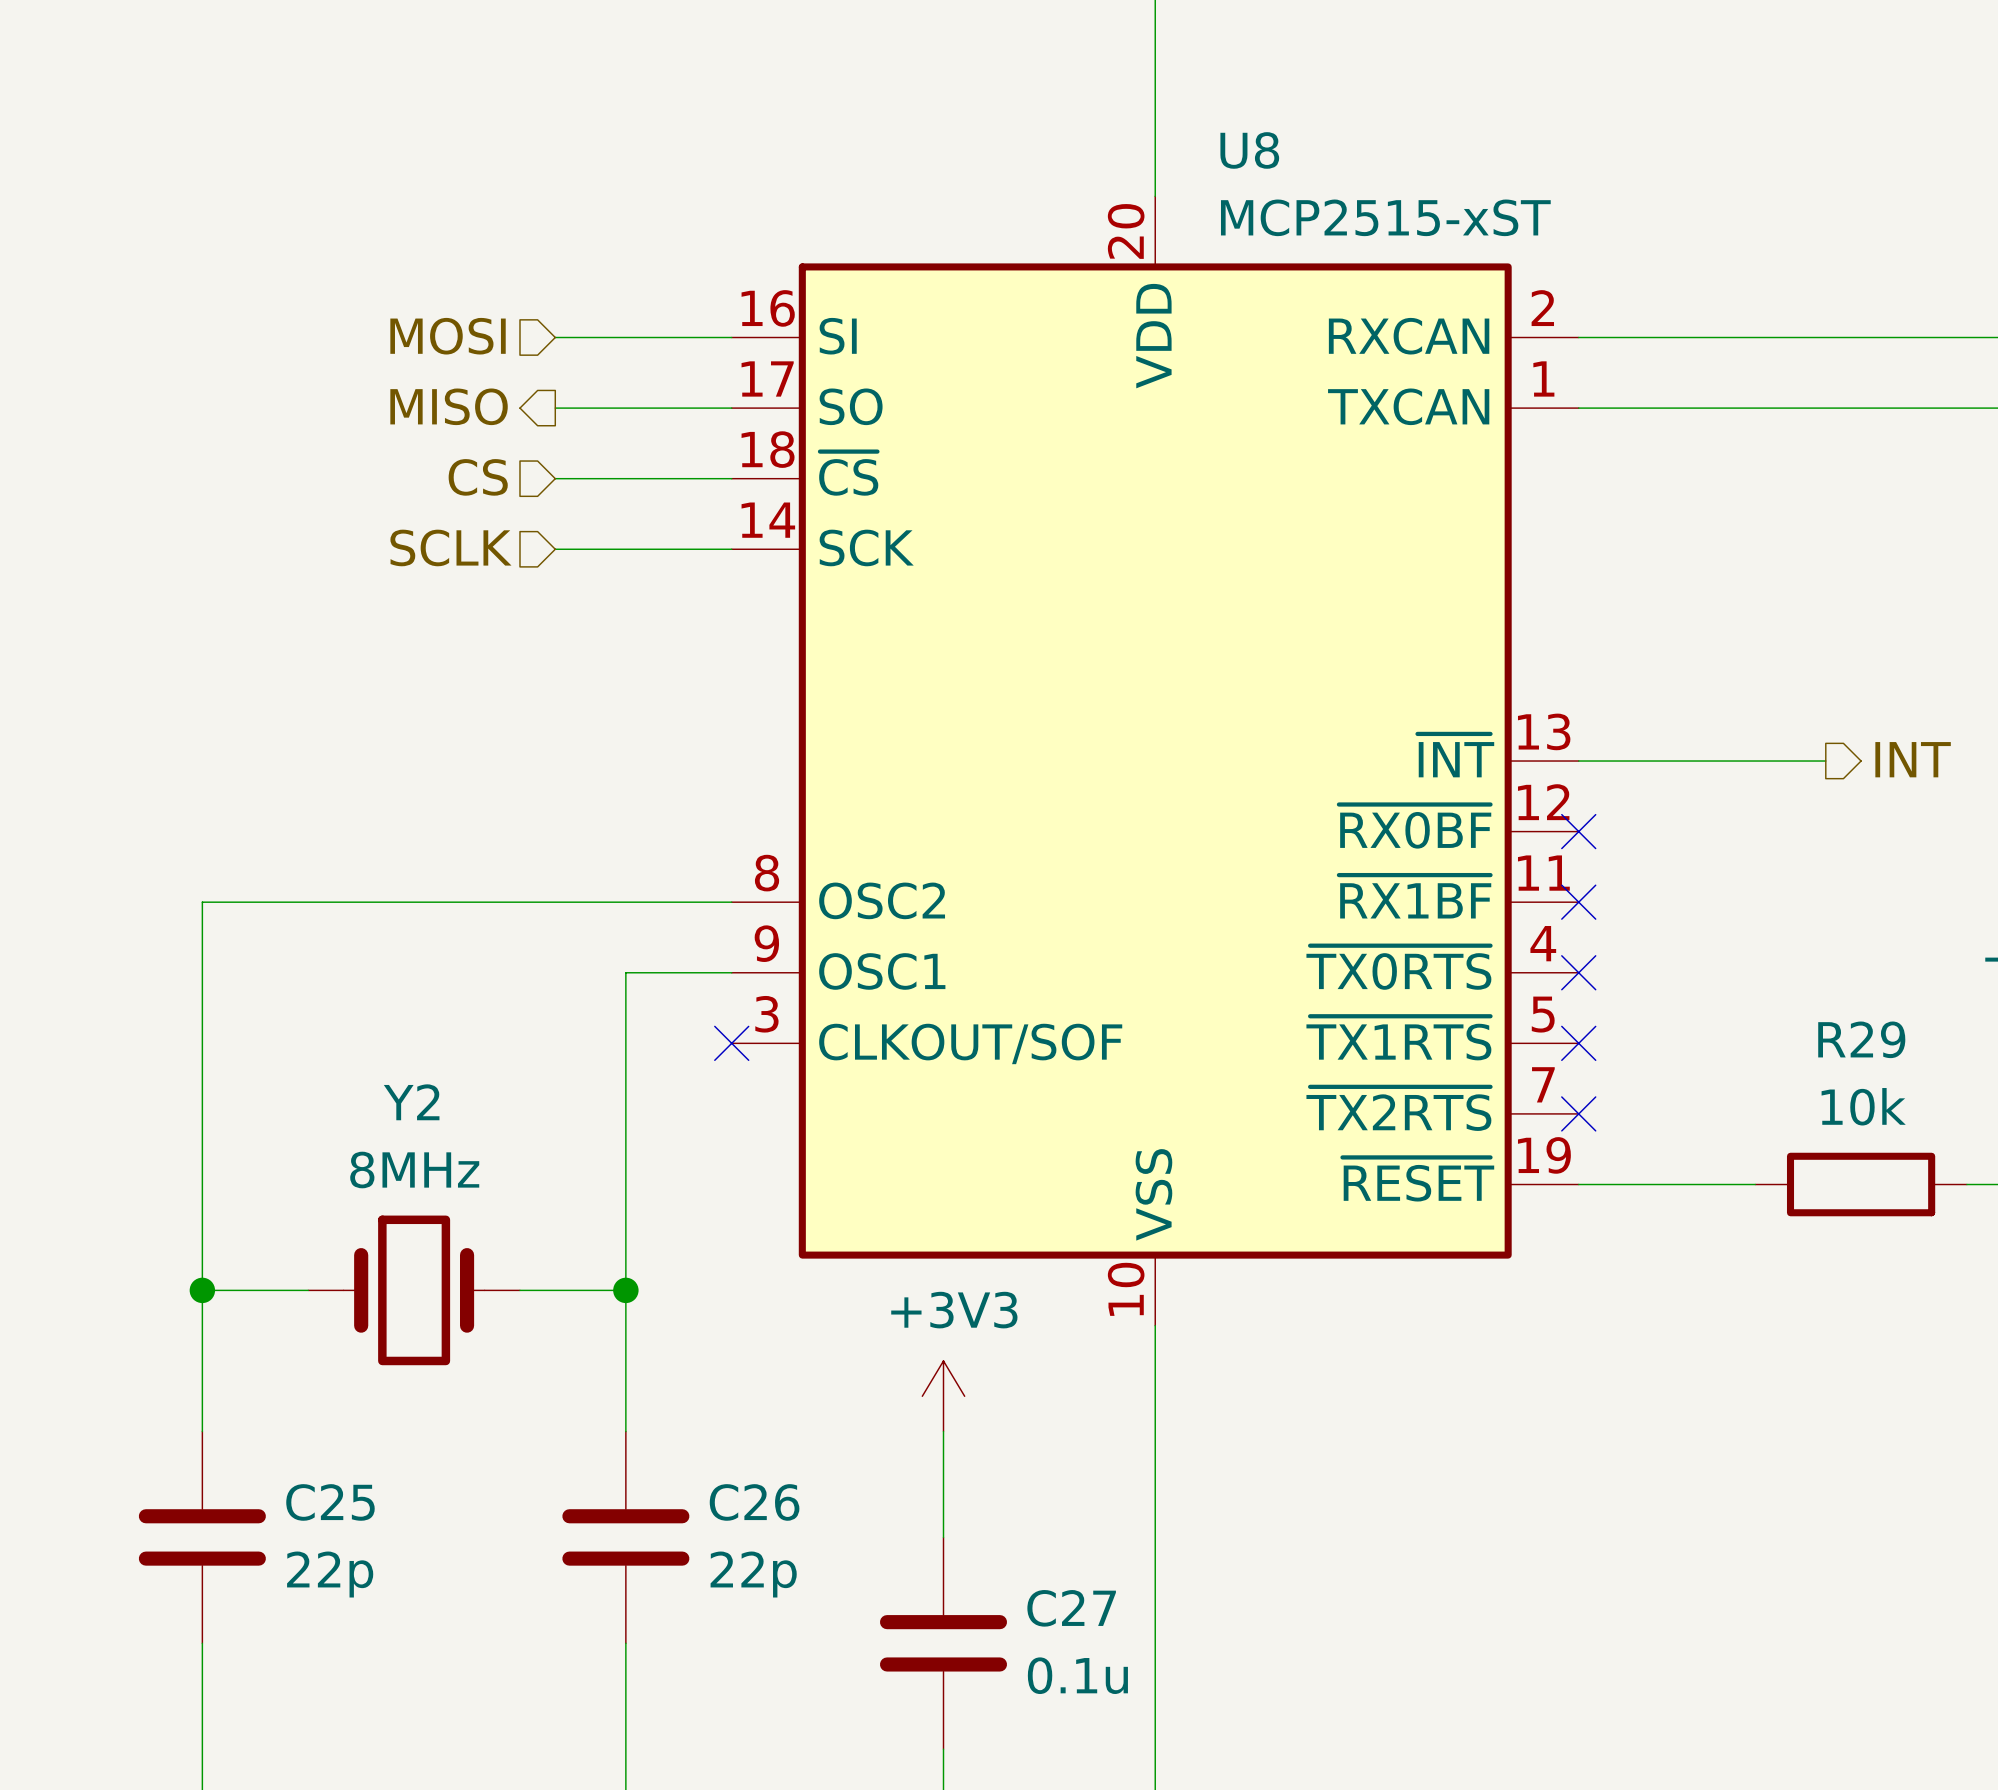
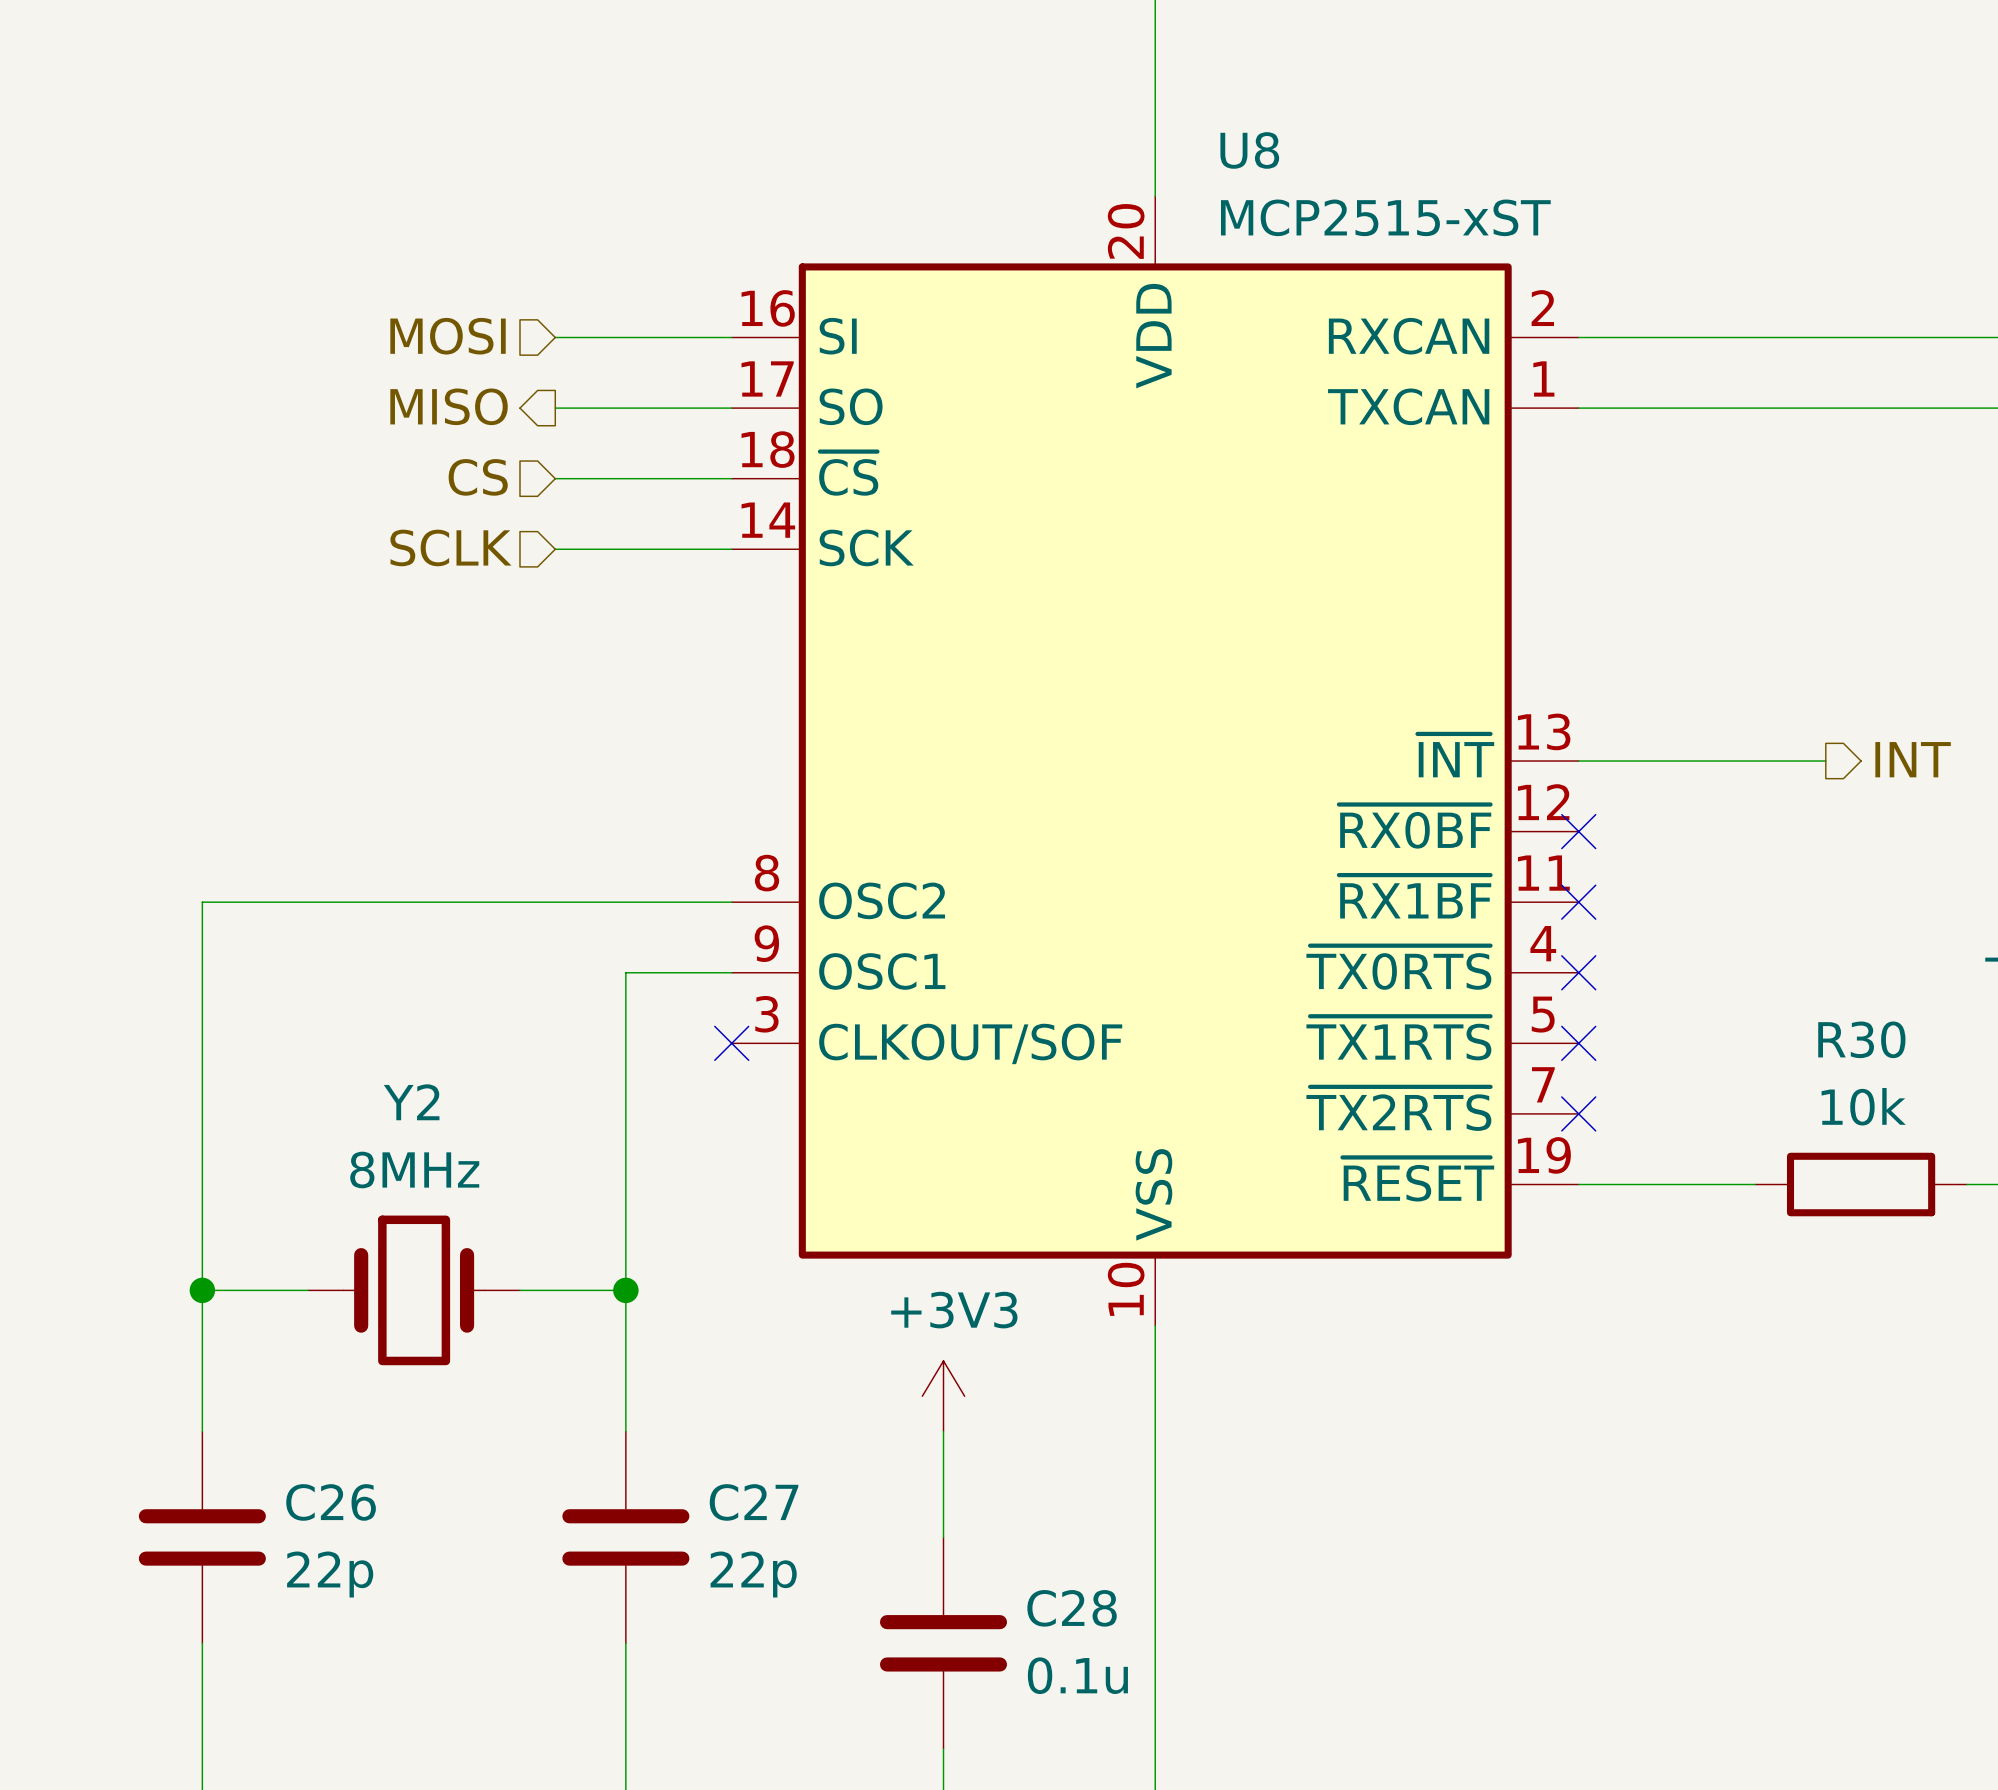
R29 name: R29 (1861, 1039) -> R30 (1861, 1039)
C25 name: C25 (330, 1502) -> C26 (331, 1502)
C26 name: C26 (754, 1502) -> C27 (754, 1502)
C27 name: C27 (1071, 1608) -> C28 (1072, 1608)

